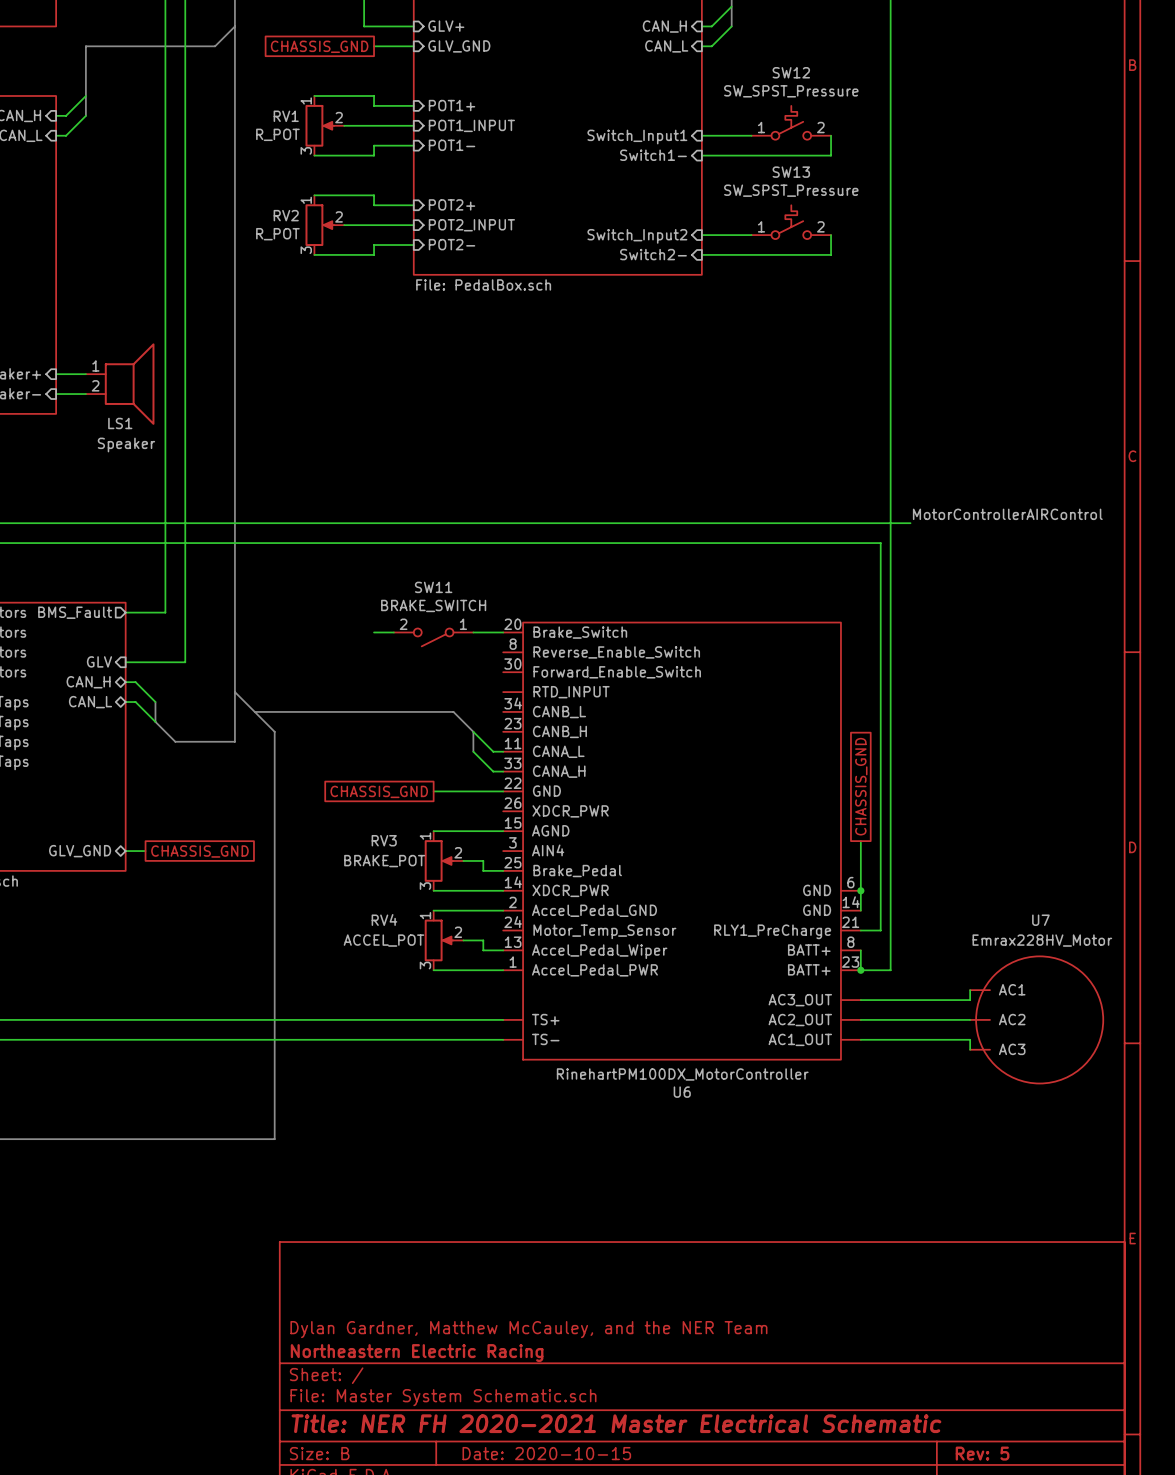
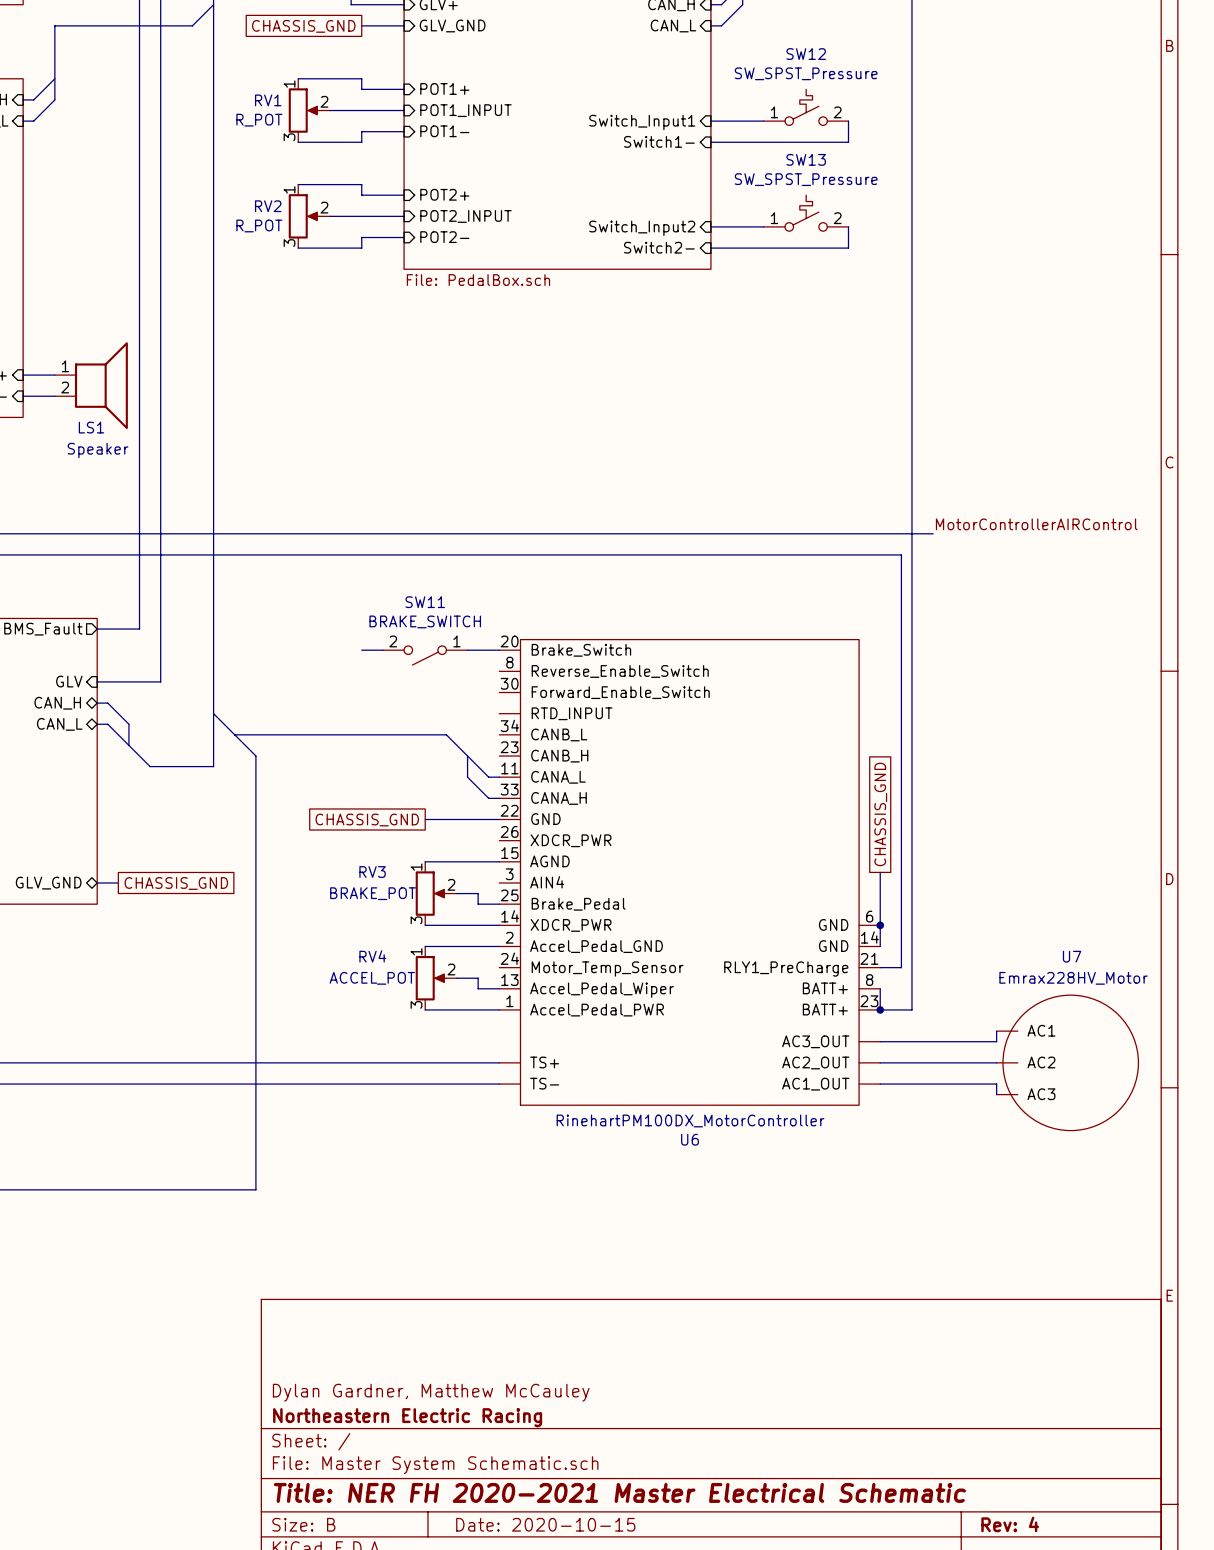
title block: Dylan Gardner, Matthew McCauley, and the NER Team (528, 1329) -> Dylan Gardner, Matthew McCauley (431, 1392)
title block: Rev: 5 (982, 1453) -> Rev: 4 (1010, 1524)

